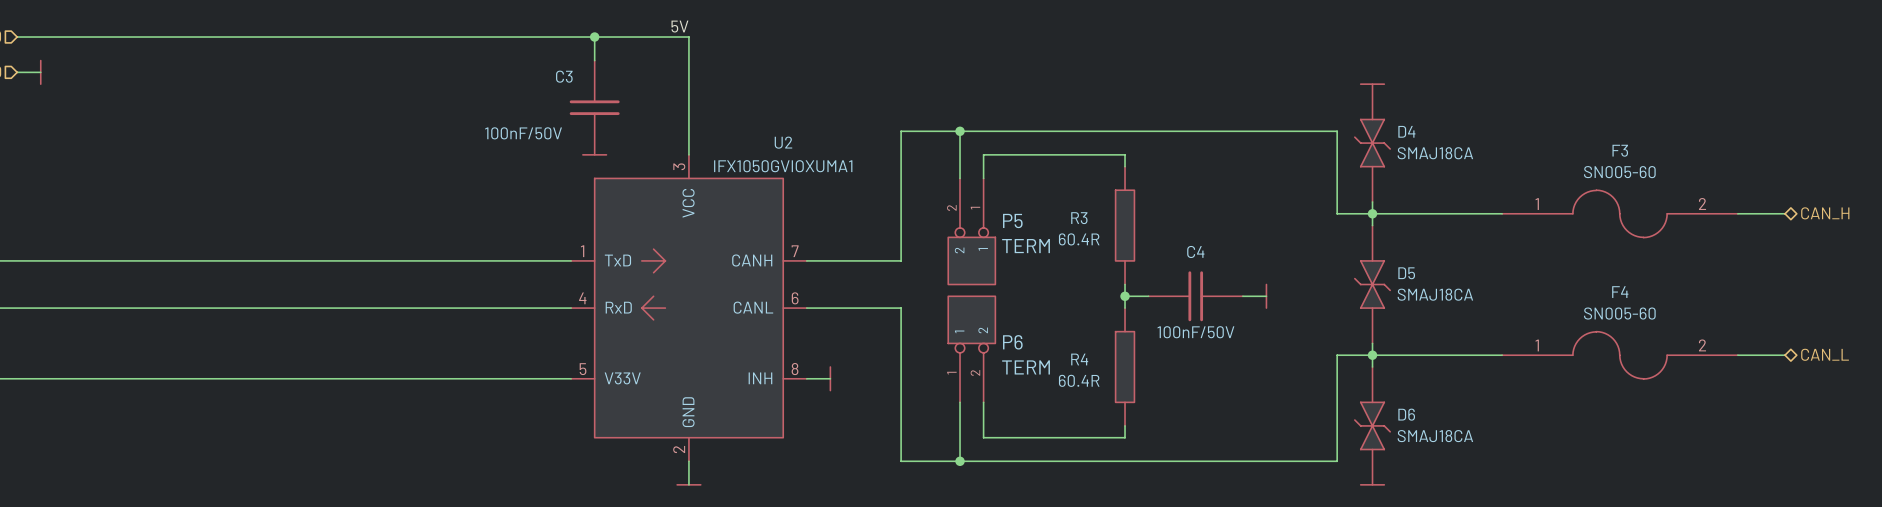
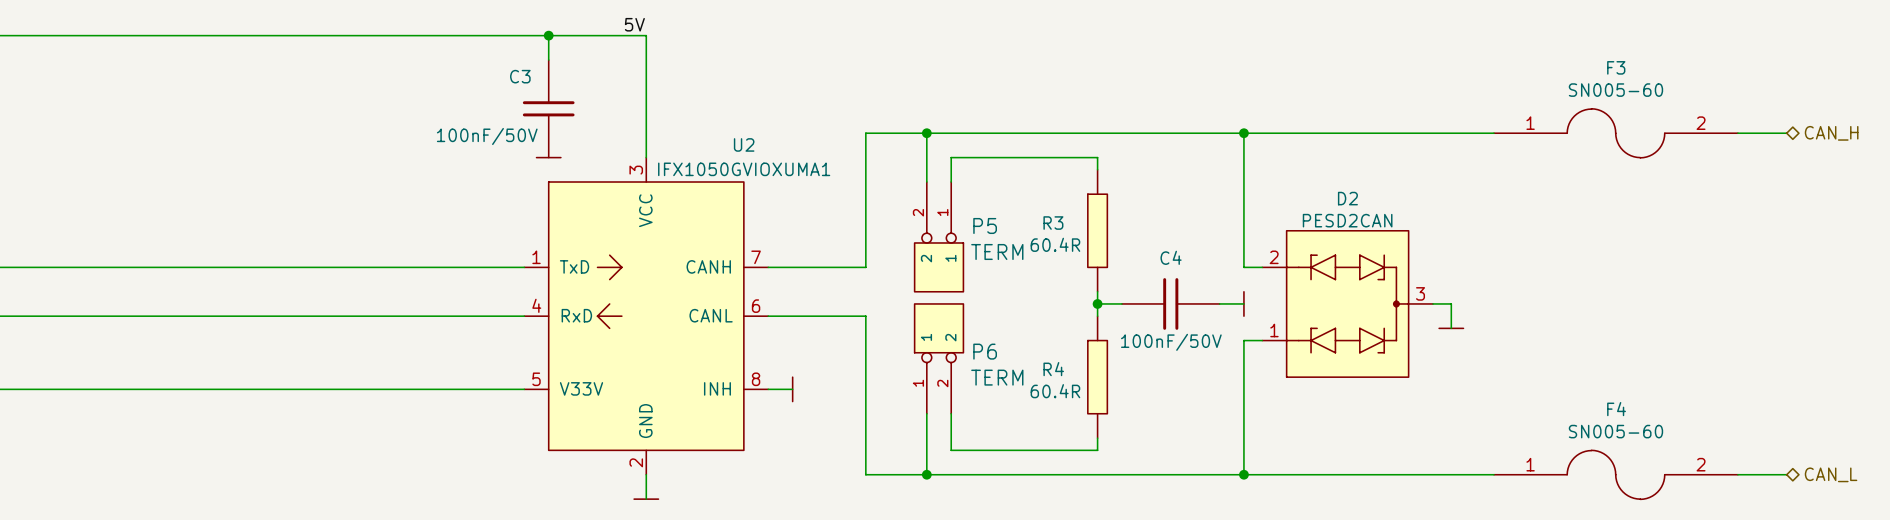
power symbol: (1372, 84) -> none
wire: none -> (1243, 133) (1243, 267) (1262, 267)
junction: none -> (1243, 133)
wire: (1337, 131) (1337, 213) (1502, 213) -> (1317, 133) (1493, 133)
D4: SMAJ18CA (1372, 143) -> none
wire: (1372, 202) (1372, 225) -> none
junction: (1372, 213) -> none
F3 position: (1620, 213) -> (1615, 133)
wire: (1737, 213) (1785, 213) -> (1737, 133) (1786, 133)
hierarchical label position: CAN_H (1825, 213) -> CAN_H (1831, 133)
D5: SMAJ18CA (1372, 284) -> none
D2: none -> PESD2CAN (1347, 303)
wire: none -> (1433, 303) (1451, 303) (1451, 328)
power symbol: none -> (1451, 328)
wire: none -> (1262, 340) (1243, 340) (1243, 474)
hierarchical label position: CAN_L (1825, 354) -> CAN_L (1831, 474)
junction: (1372, 355) -> none
wire: (1502, 355) (1337, 355) (1337, 461) -> (1493, 474) (1317, 474)
F4 position: (1620, 355) -> (1615, 474)
wire: (1737, 355) (1785, 355) -> (1737, 474) (1786, 474)
D6: SMAJ18CA (1372, 425) -> none
junction: none -> (1243, 474)
power symbol: (1372, 484) -> none

